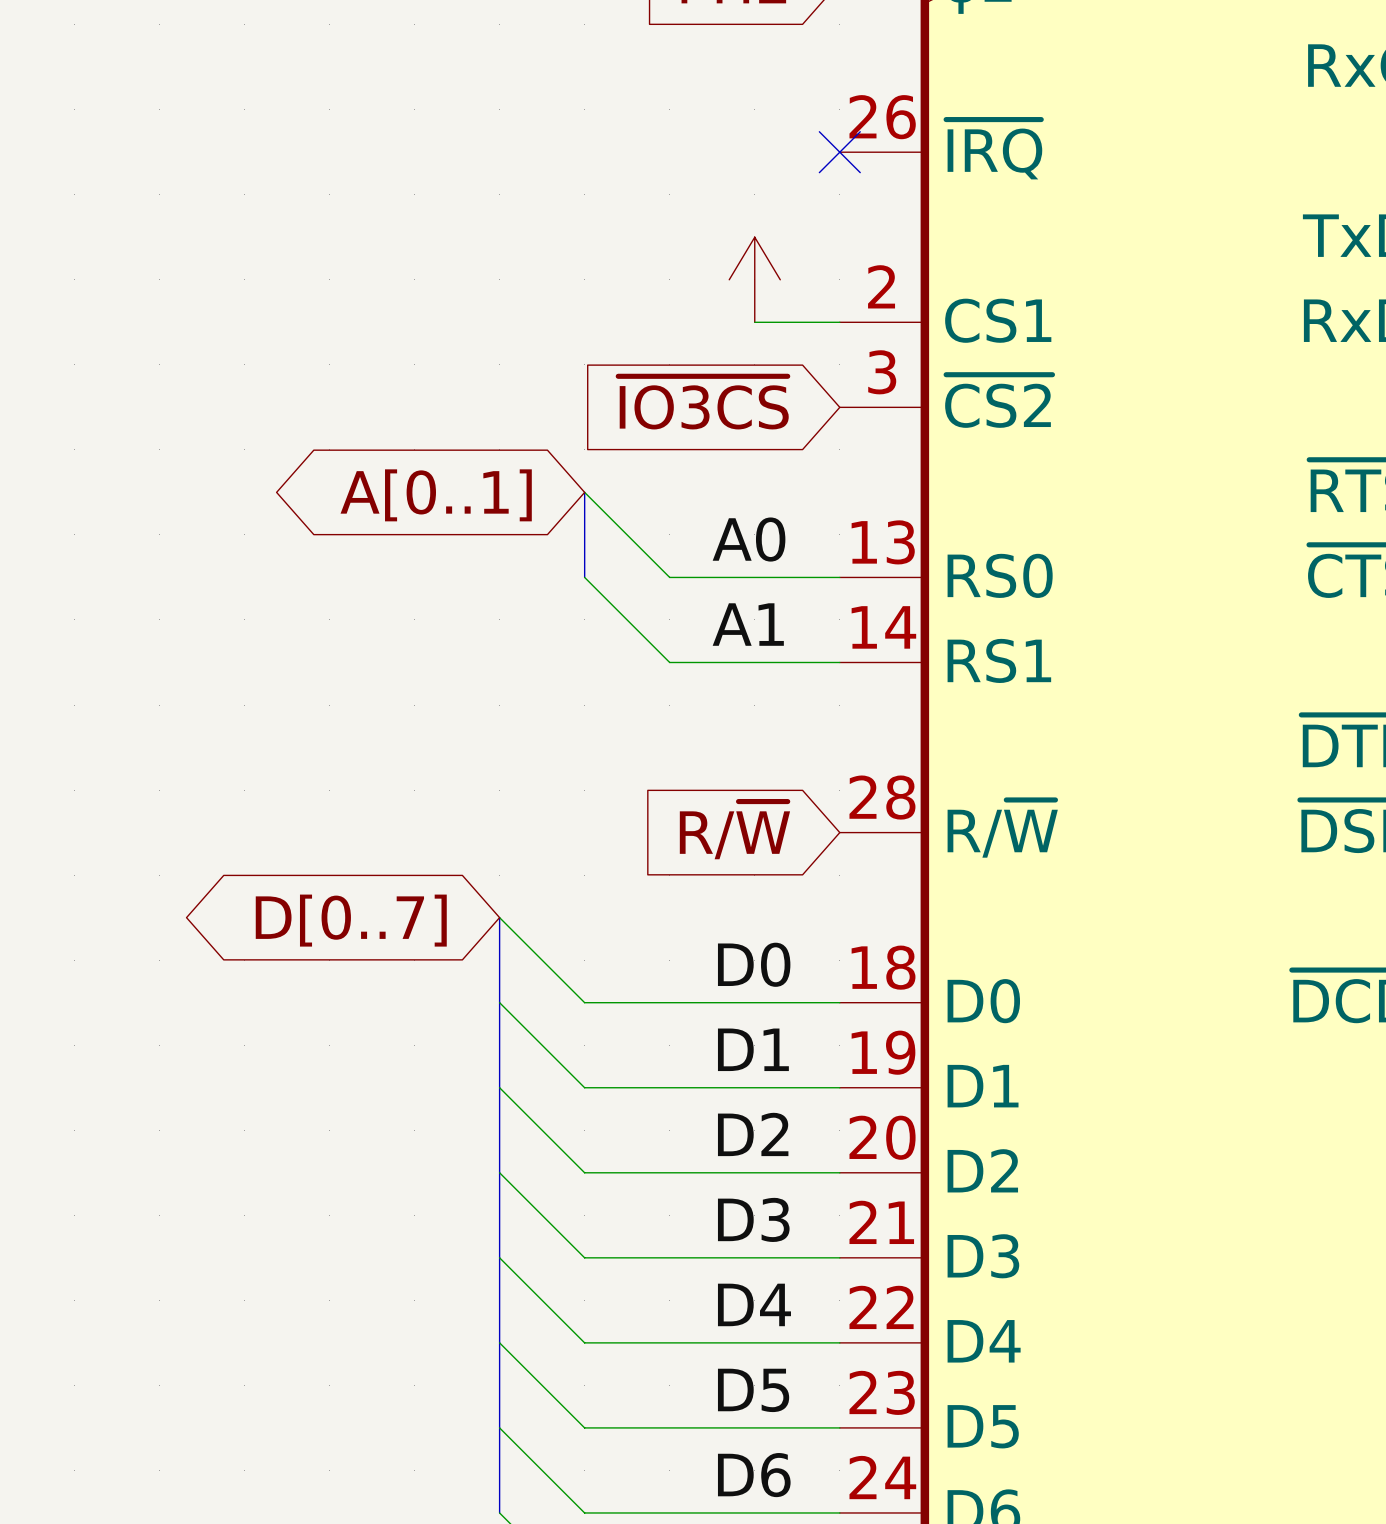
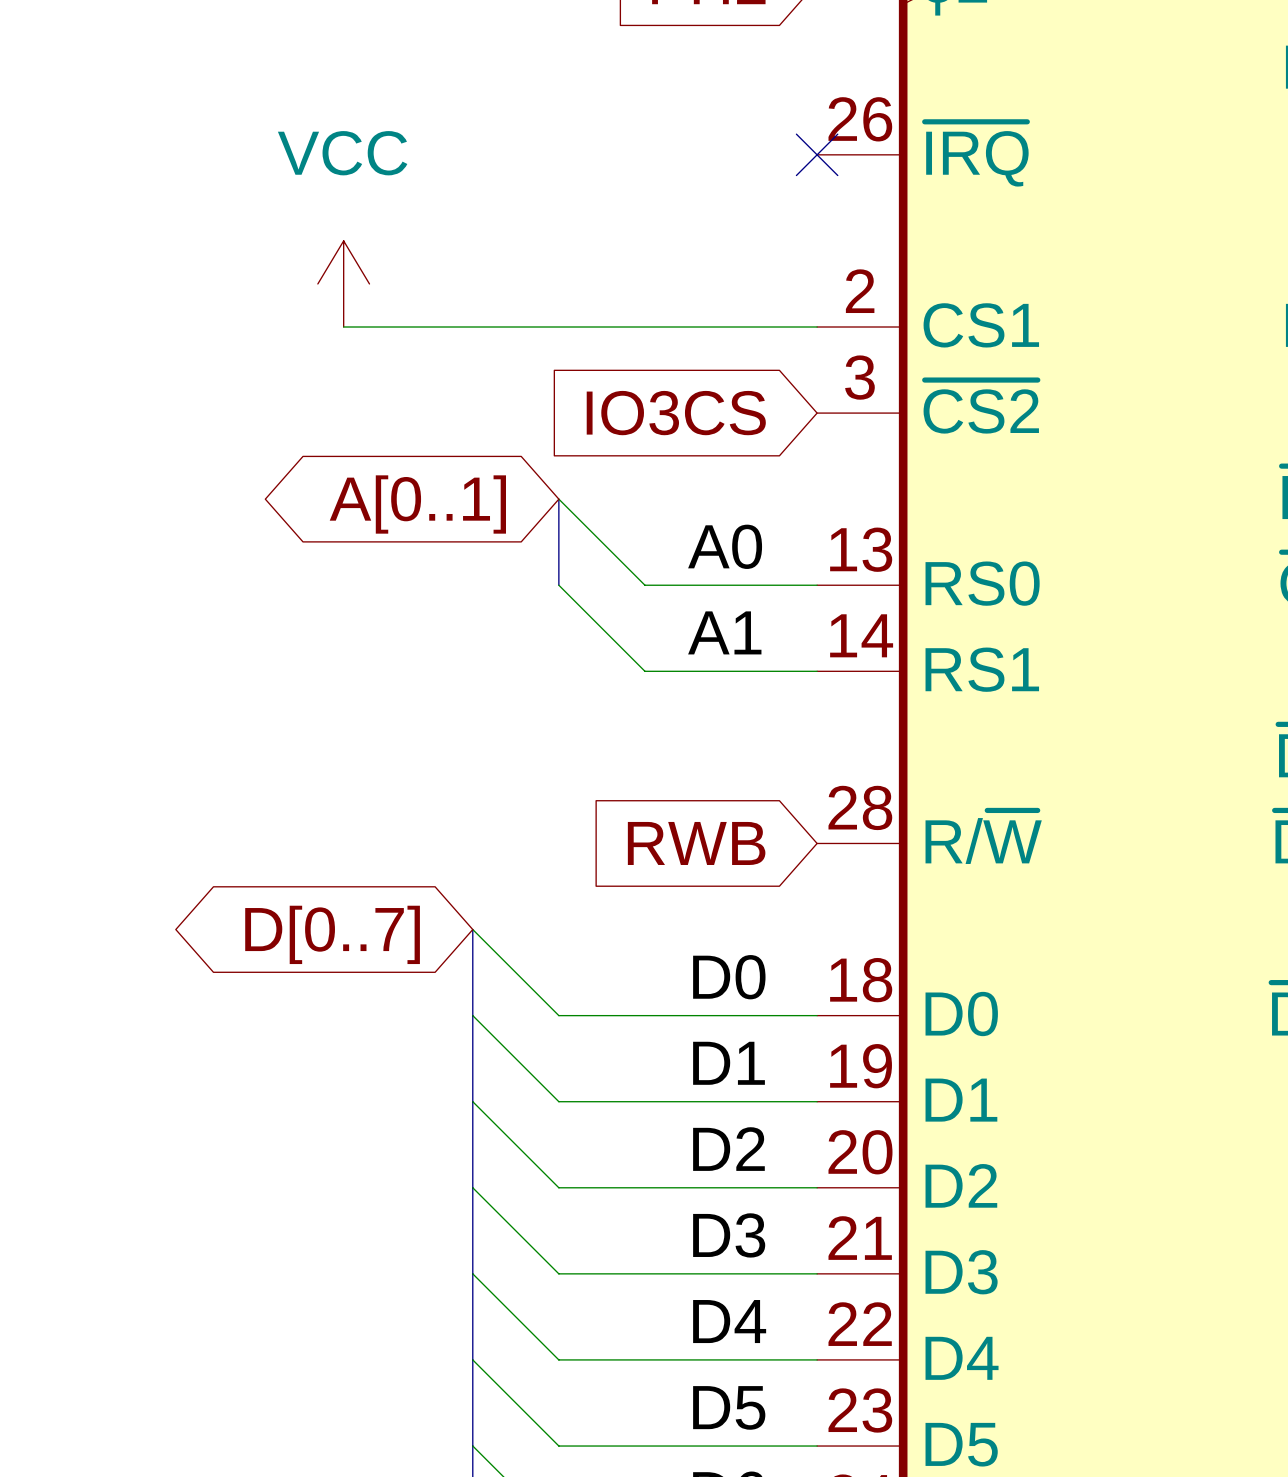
power symbol: none -> VCC (343, 283)
power symbol: (754, 279) -> none
wire: none -> (343, 327) (731, 327)
global label: ~{IO3CS} (703, 402) -> IO3CS (676, 413)
global label: R/~{W} (734, 830) -> RWB (696, 843)

